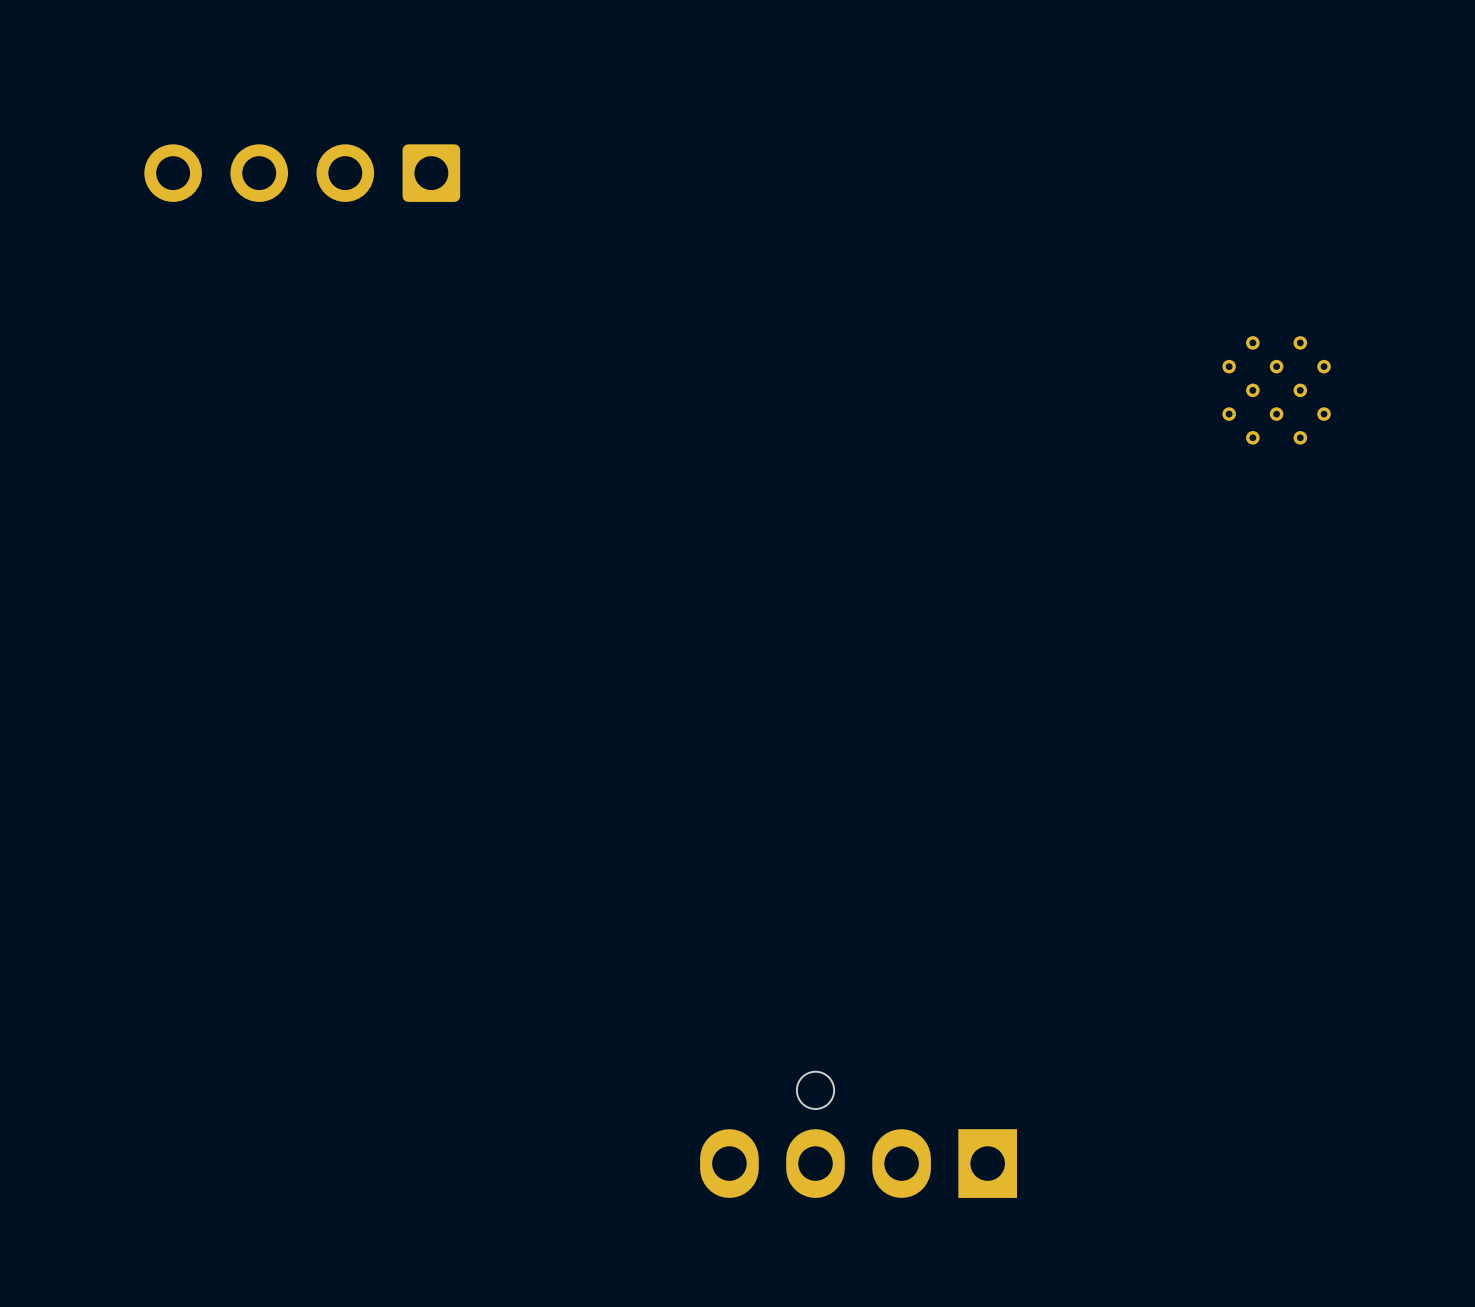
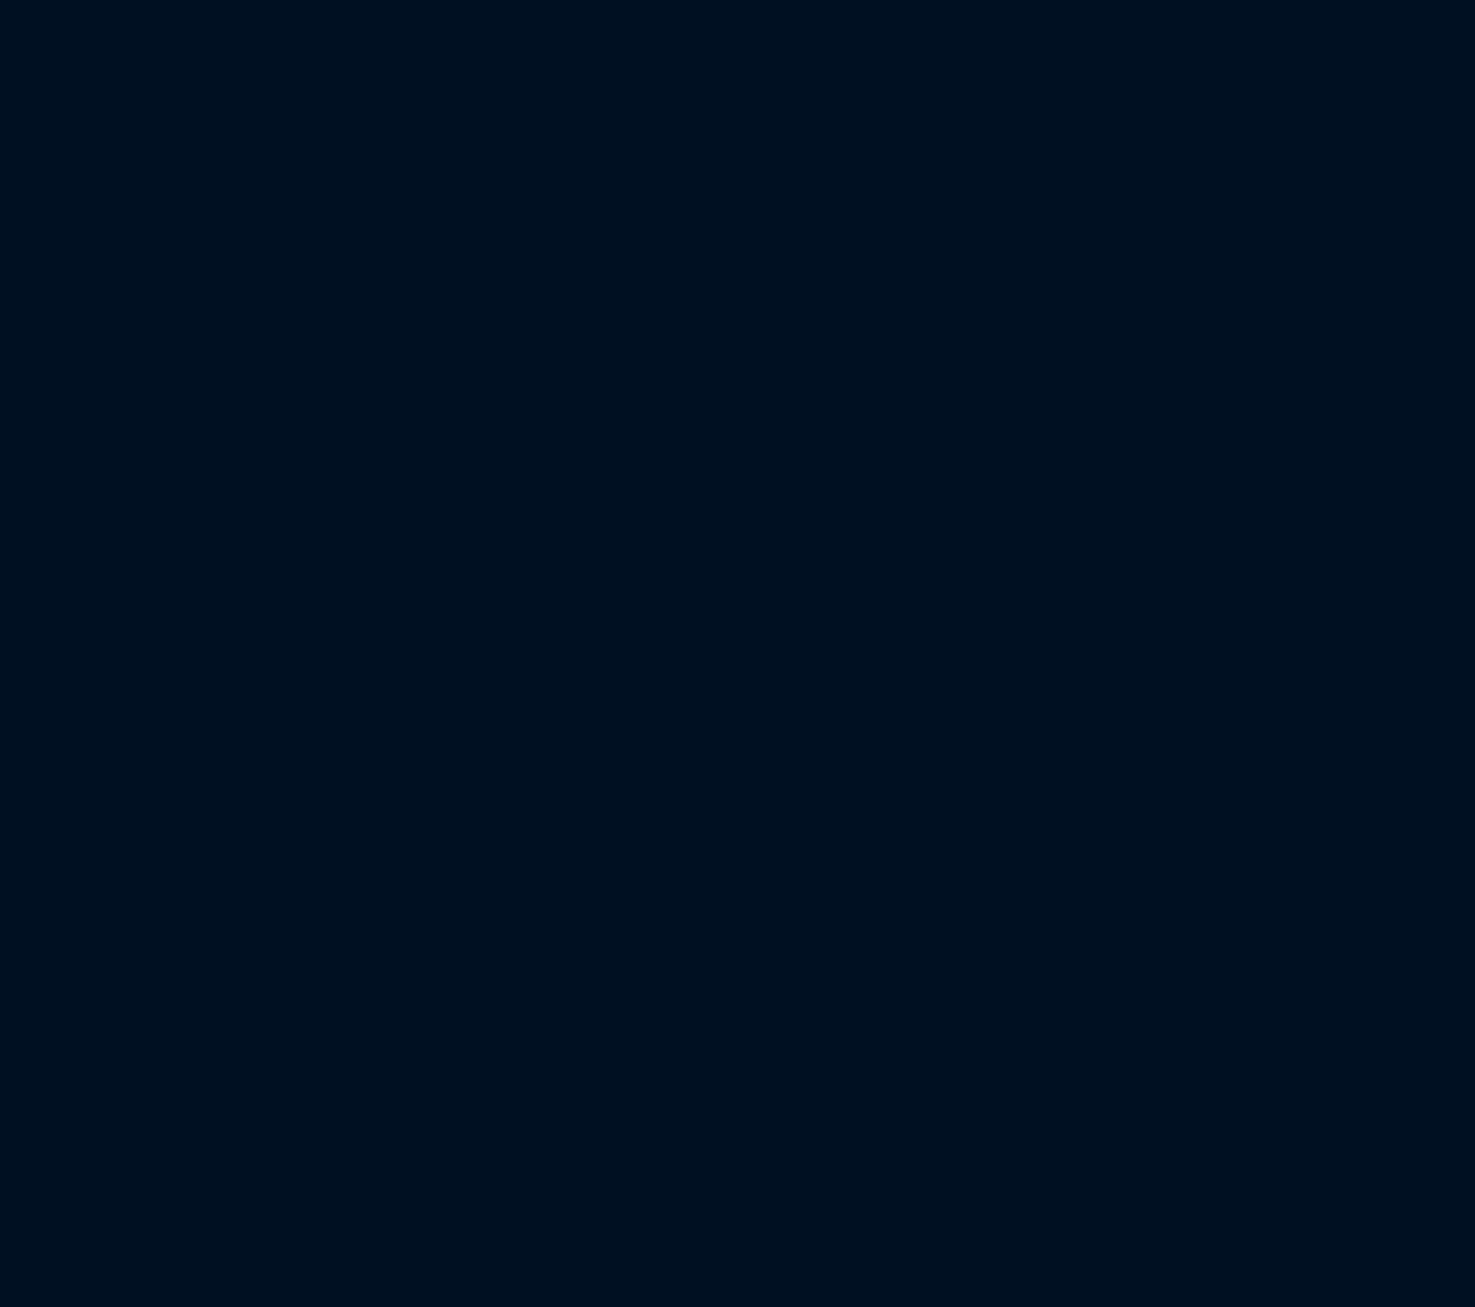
part: (302, 173) -> none
part: (1276, 390) -> none
part: (858, 1134) -> none

